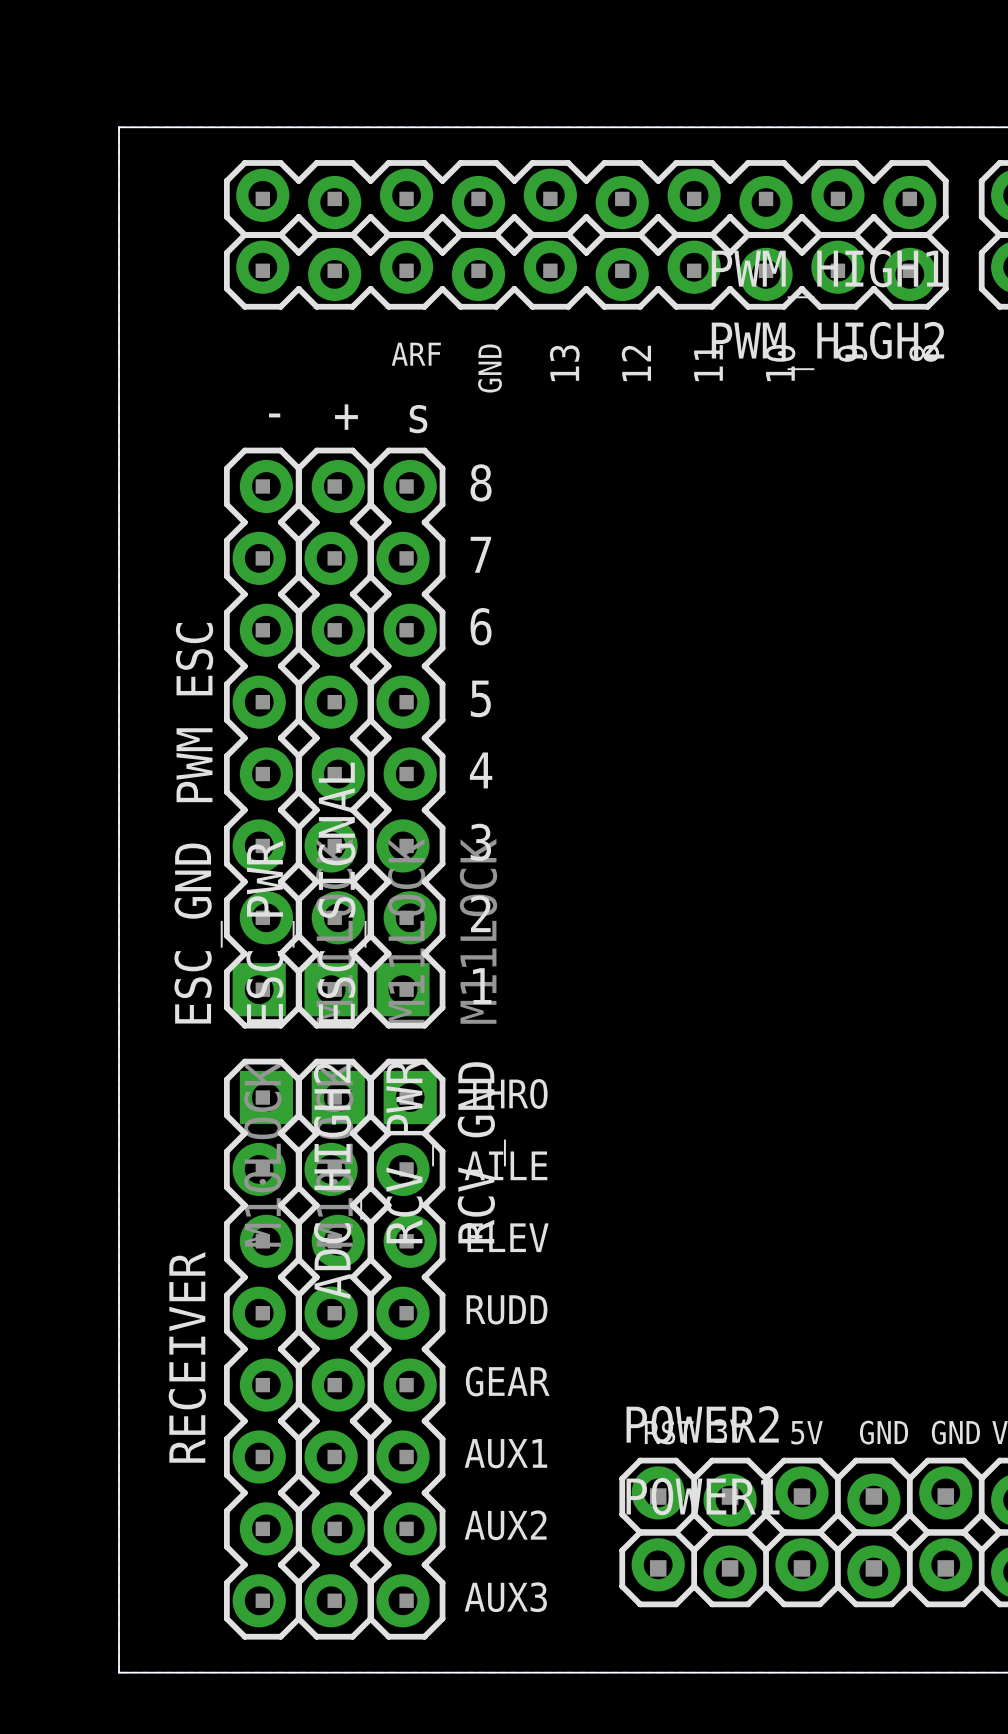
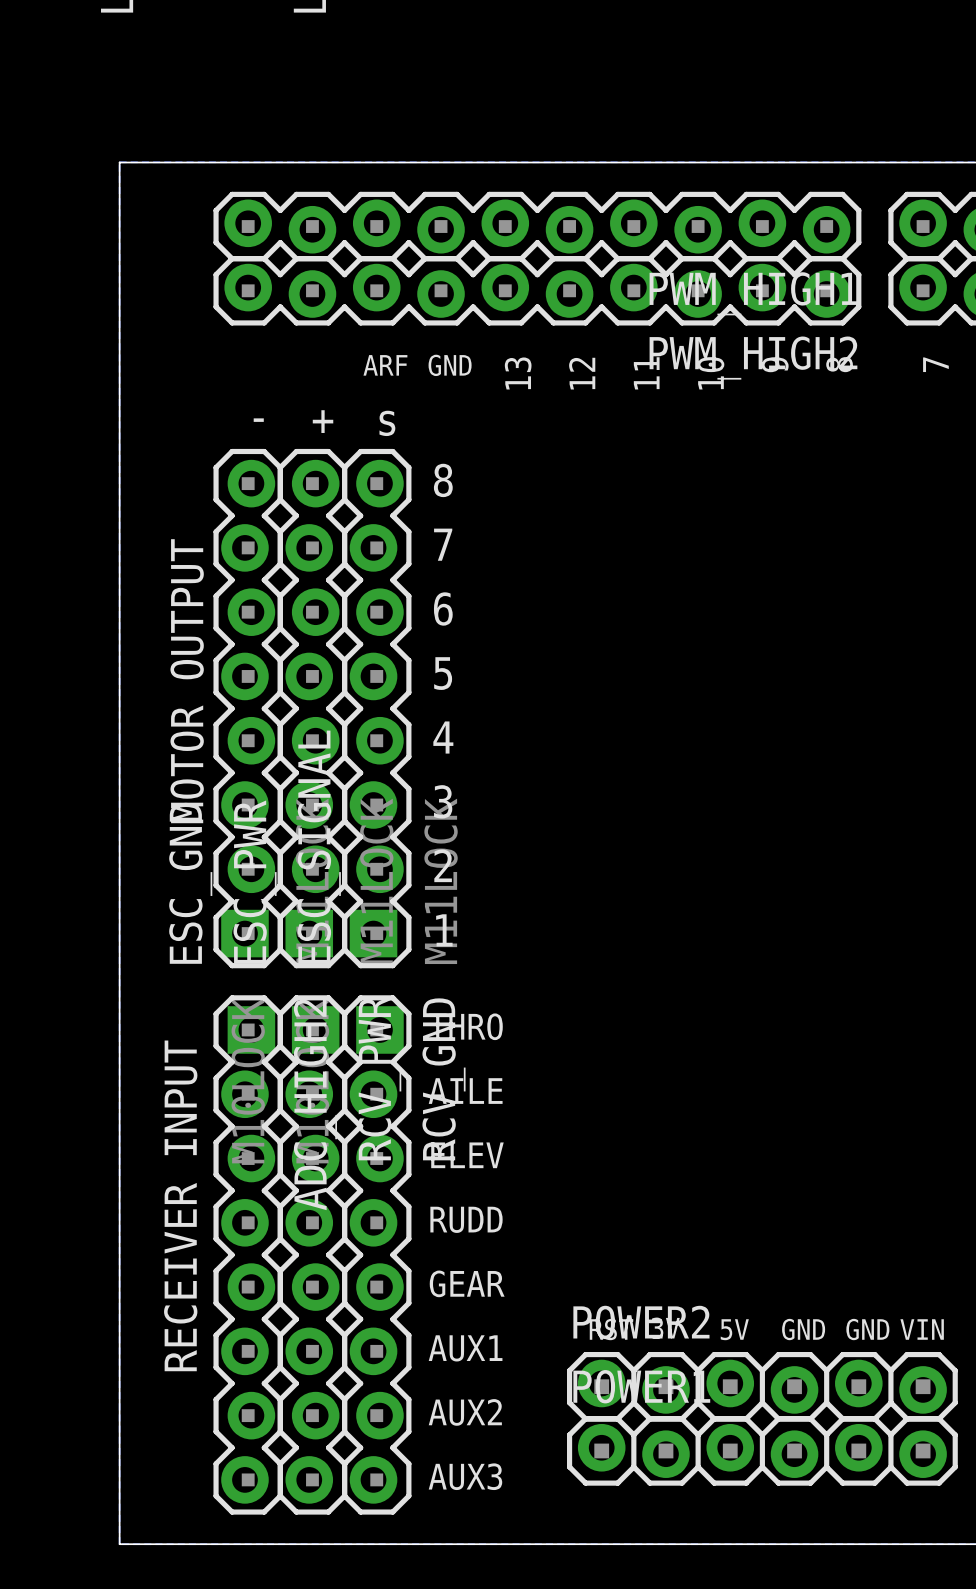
text rotation: 0° (490, 368) -> 90° clockwise (450, 365)
text: none -> MOTOR OUTPUT (187, 681)
text: PWM ESC (194, 712) -> none
text: RECEIVER (187, 1357) -> RECEIVER INPUT (180, 1205)

